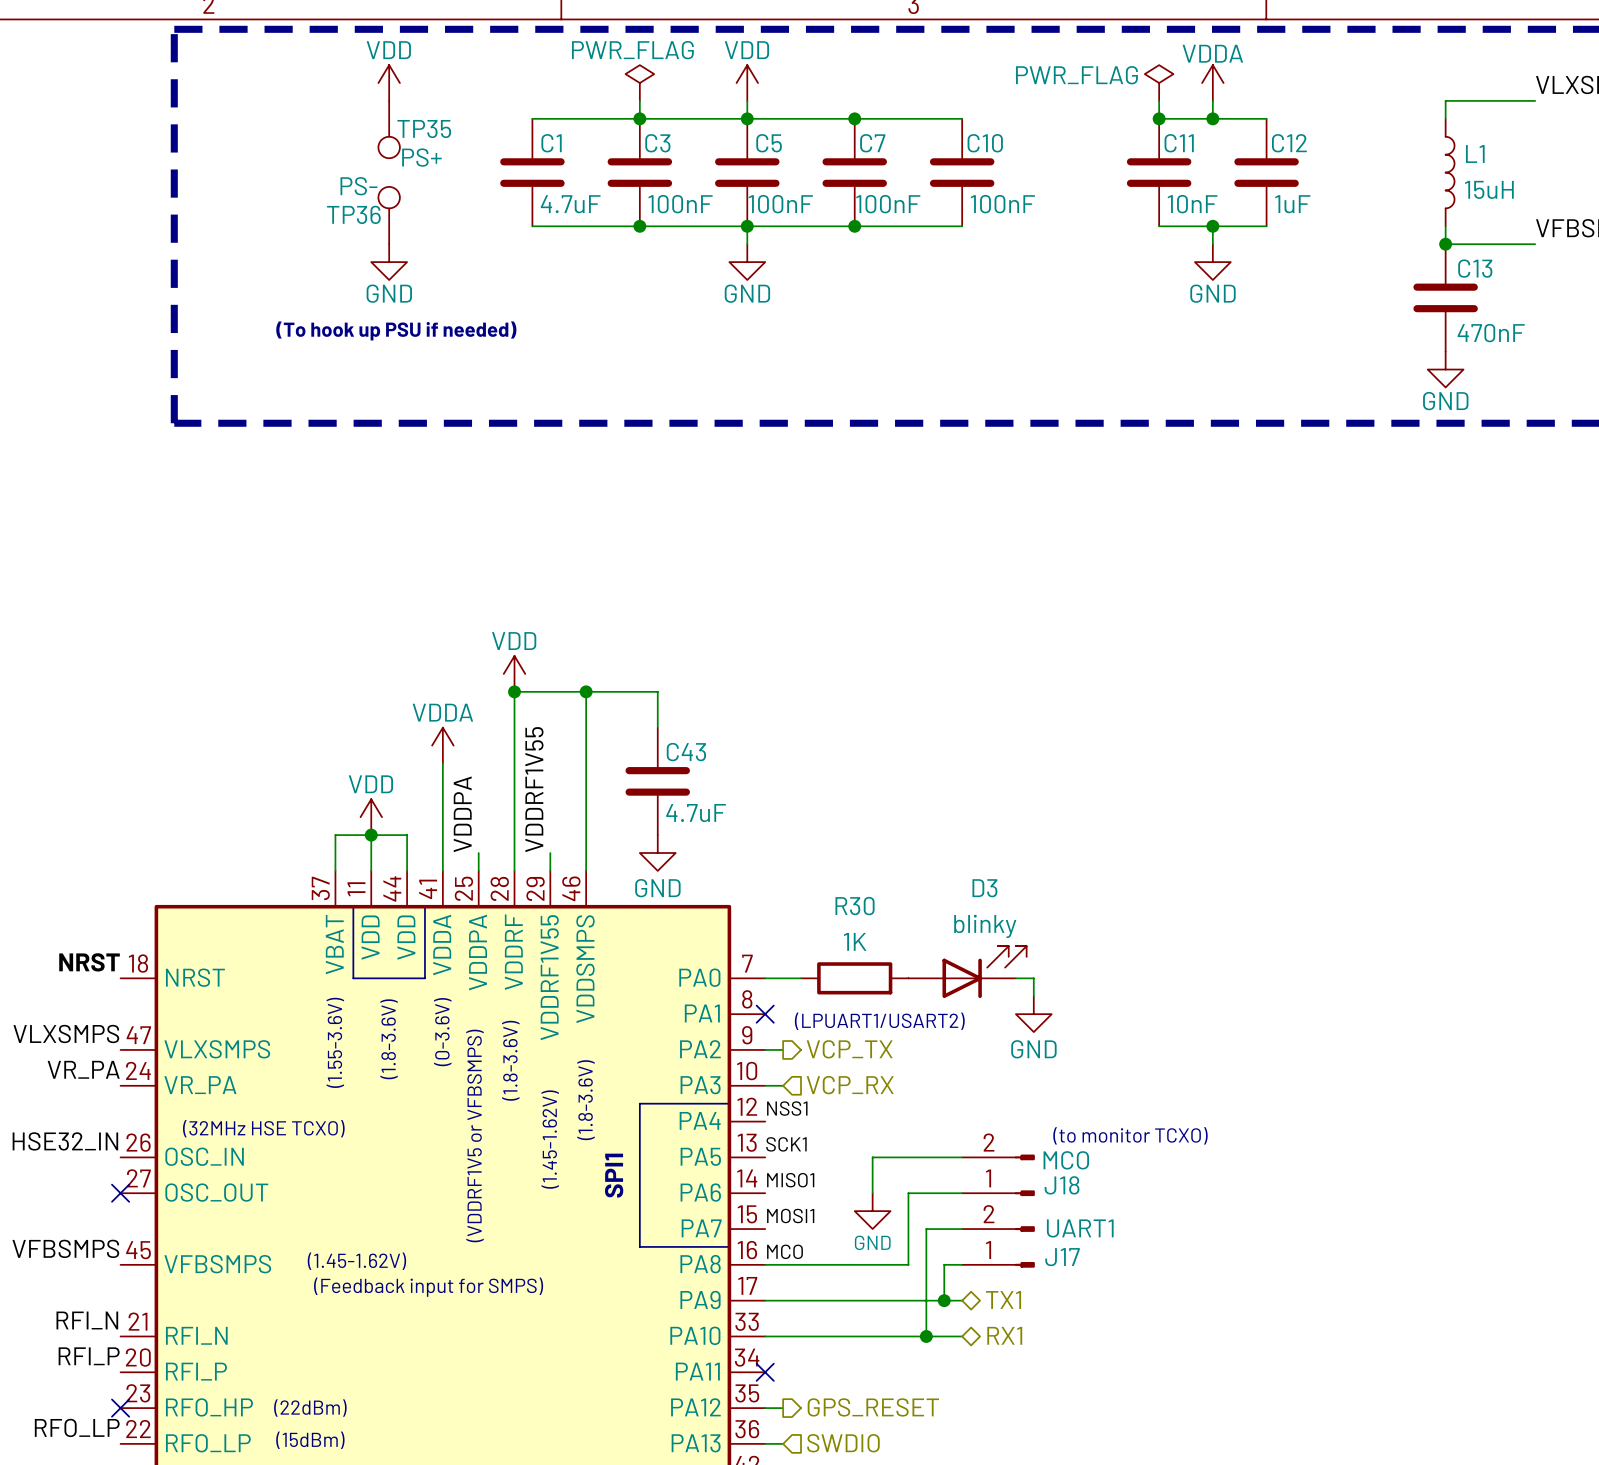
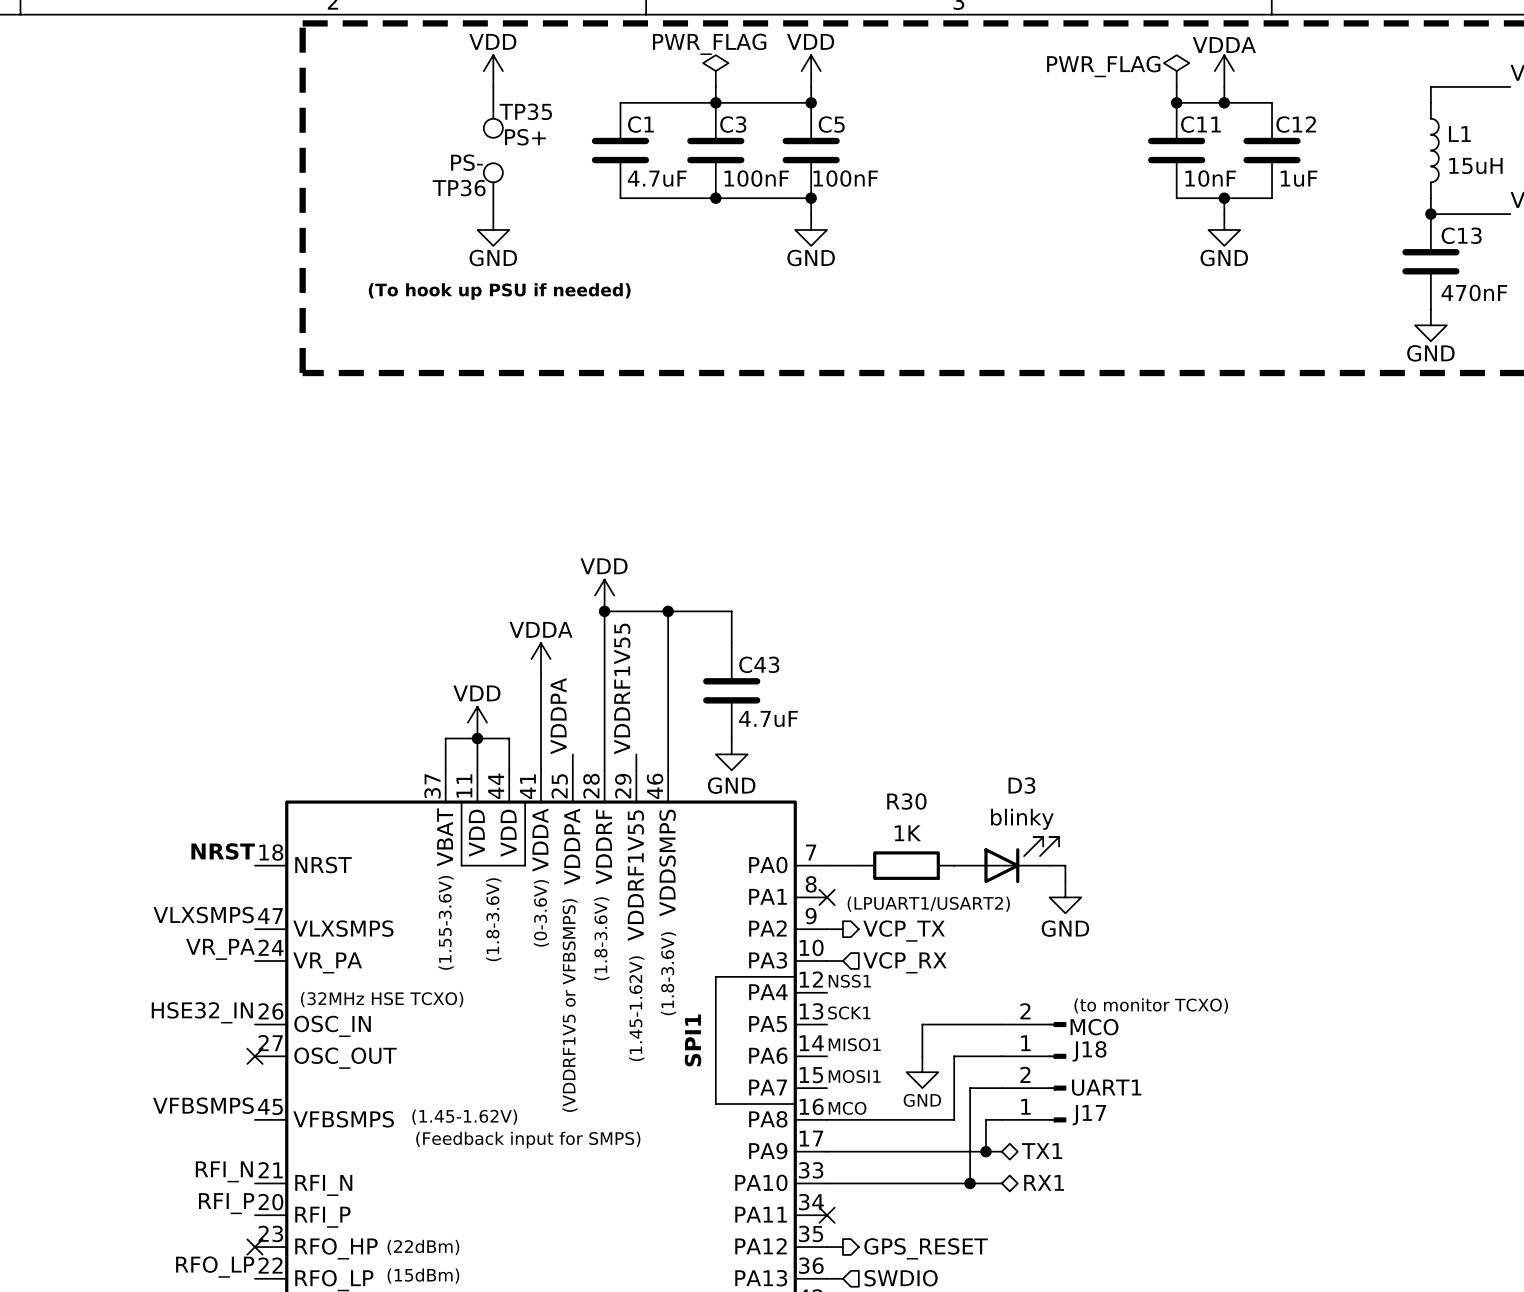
wire: (747, 118) (962, 118) -> none
junction: (854, 118) -> none
C7: 100nF (854, 172) -> none
C10: 100nF (962, 172) -> none
wire: (747, 226) (962, 226) -> none
junction: (854, 226) -> none

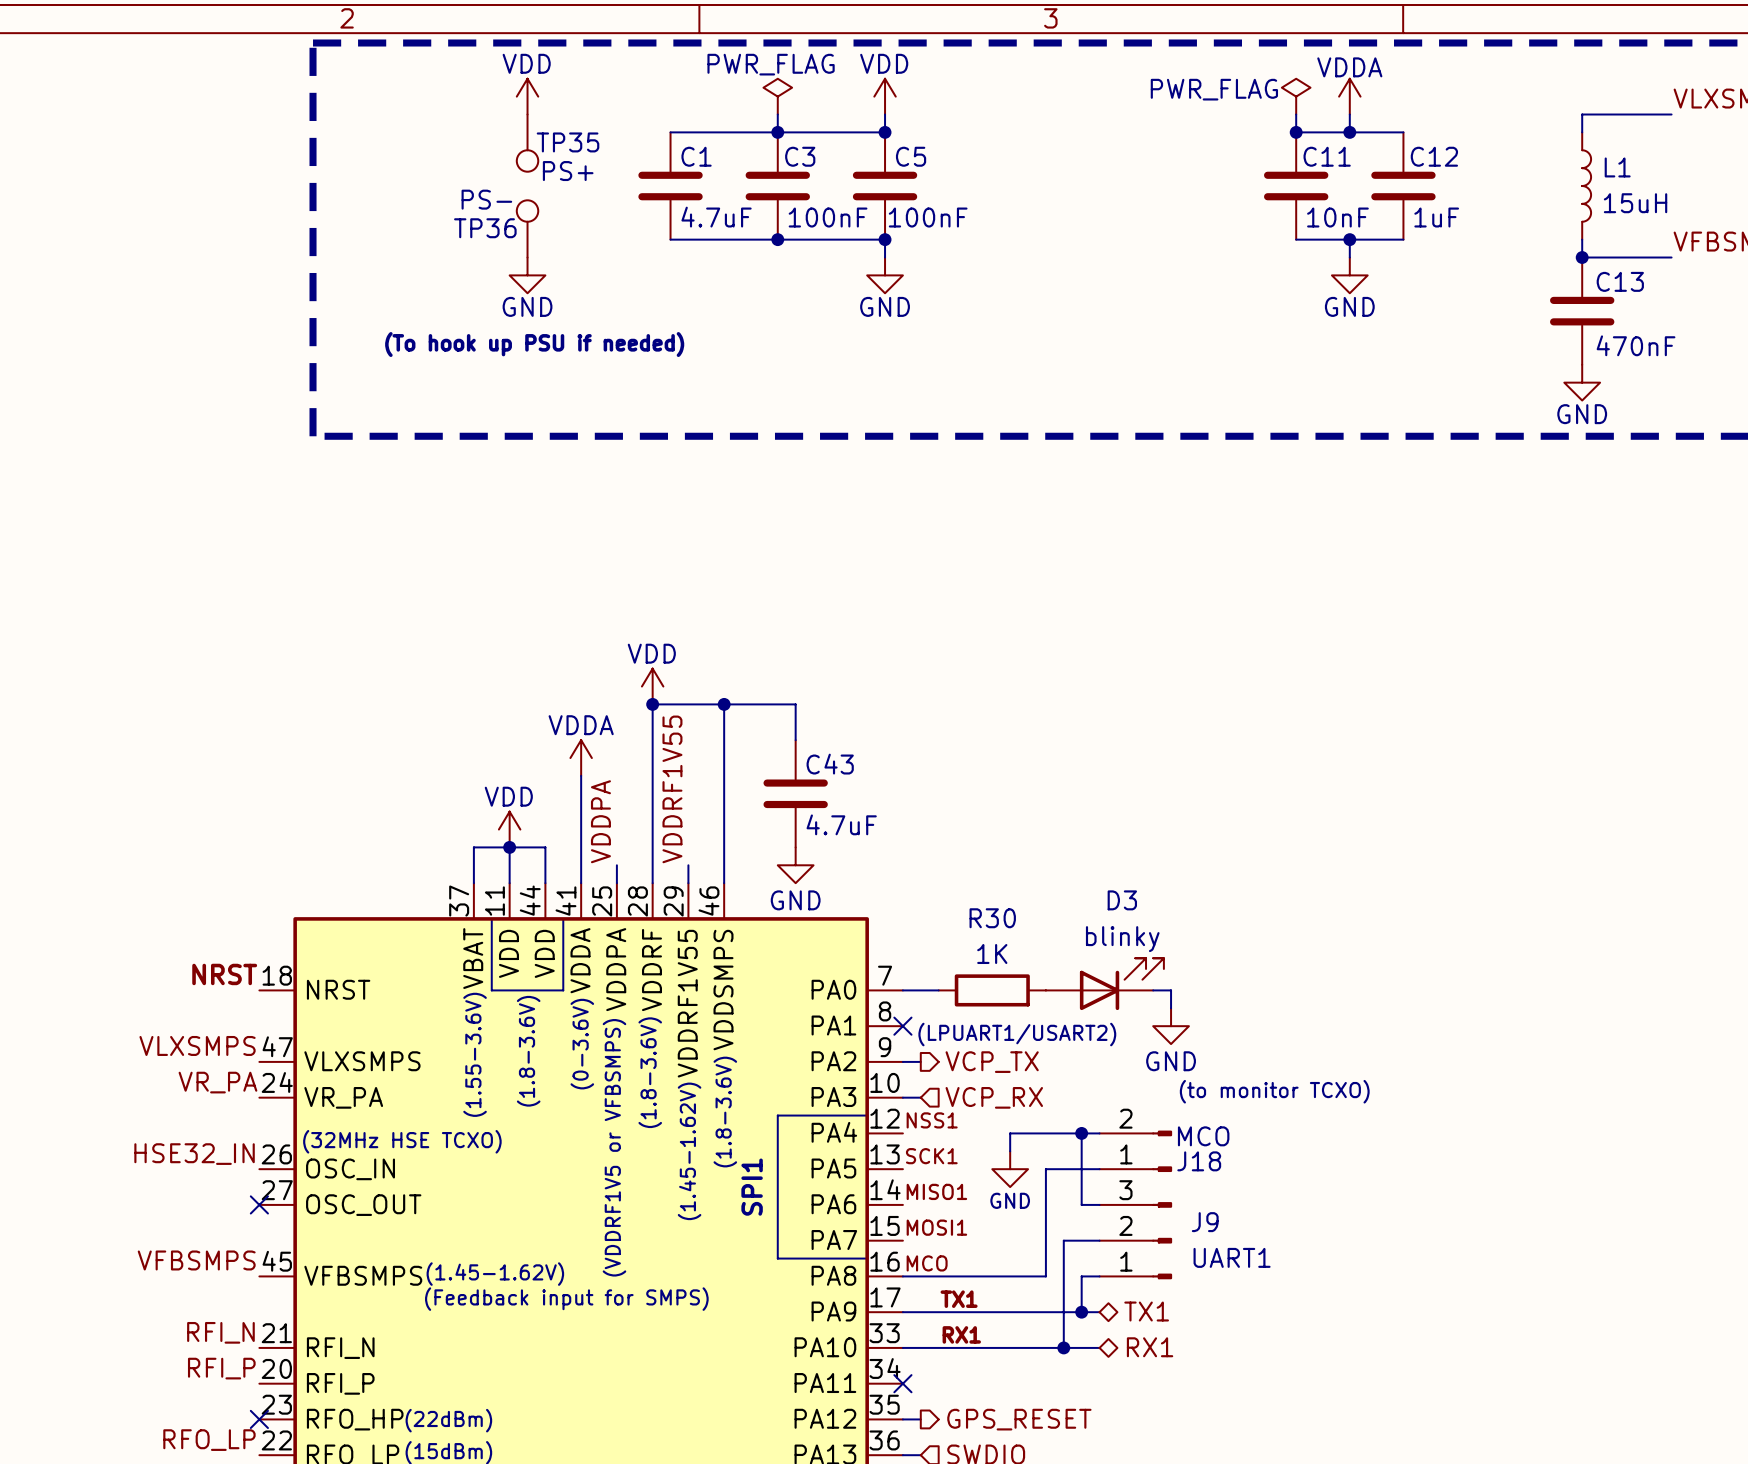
junction: none -> (1081, 1133)
wire: none -> (1099, 1133) (1010, 1133) (1010, 1151)
text position: (to monitor TCXO) (1151, 1005) -> (to monitor TCXO) (1274, 1091)
wire: (954, 1024) (922, 1024) (922, 1056) -> (1045, 1169) (1045, 1204)
J18 position: (1034, 1040) -> (1135, 1151)
wire: (954, 1056) (985, 1056) -> (1081, 1133) (1081, 1204)
power symbol position: GND (922, 1072) -> GND (1010, 1169)
J9: none -> UART1 (1135, 1240)
J17: UART1 (1034, 1104) -> none
label: none -> TX1 (959, 1299)
label: none -> RX1 (961, 1334)

